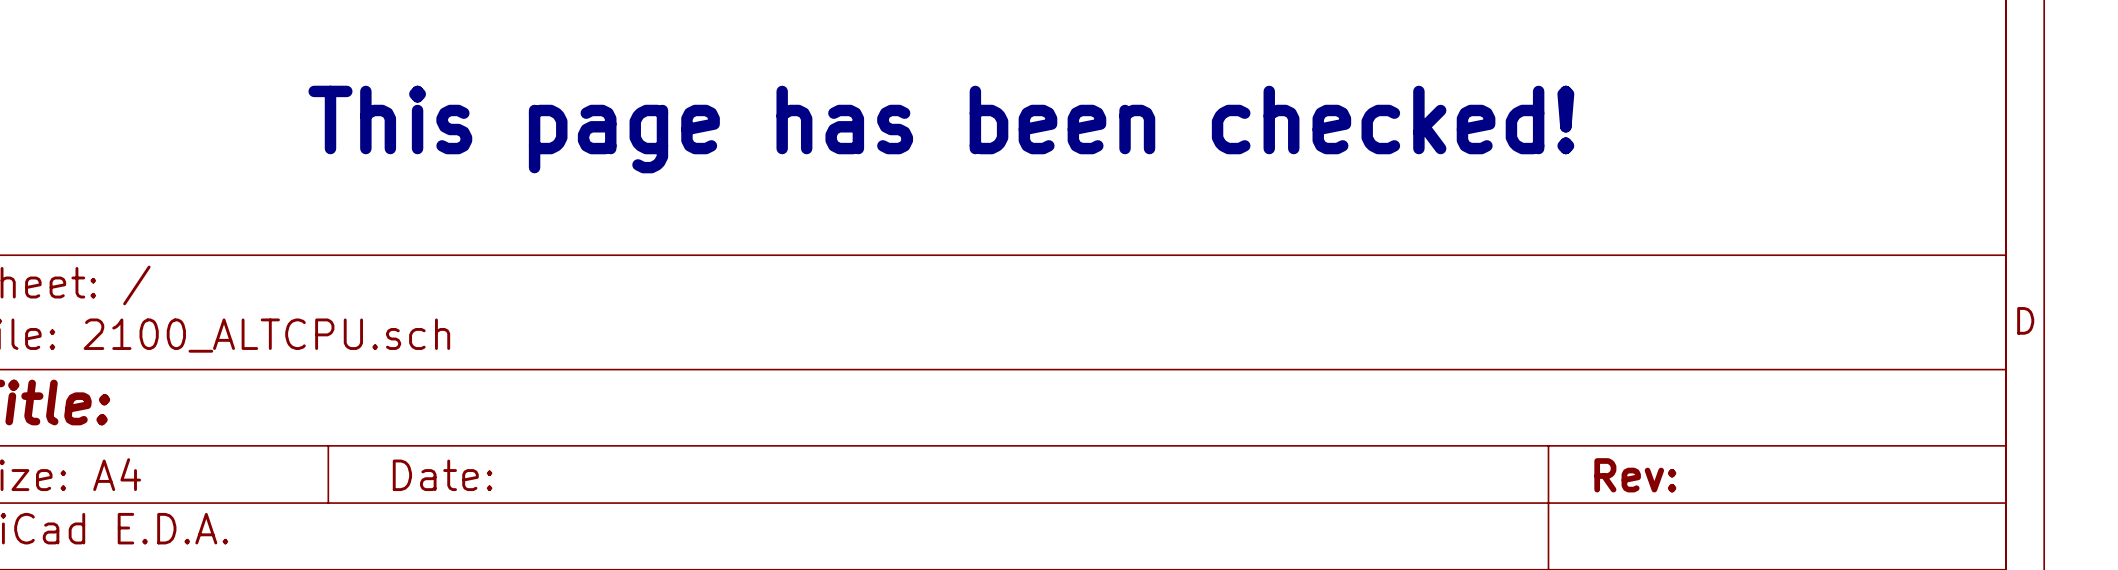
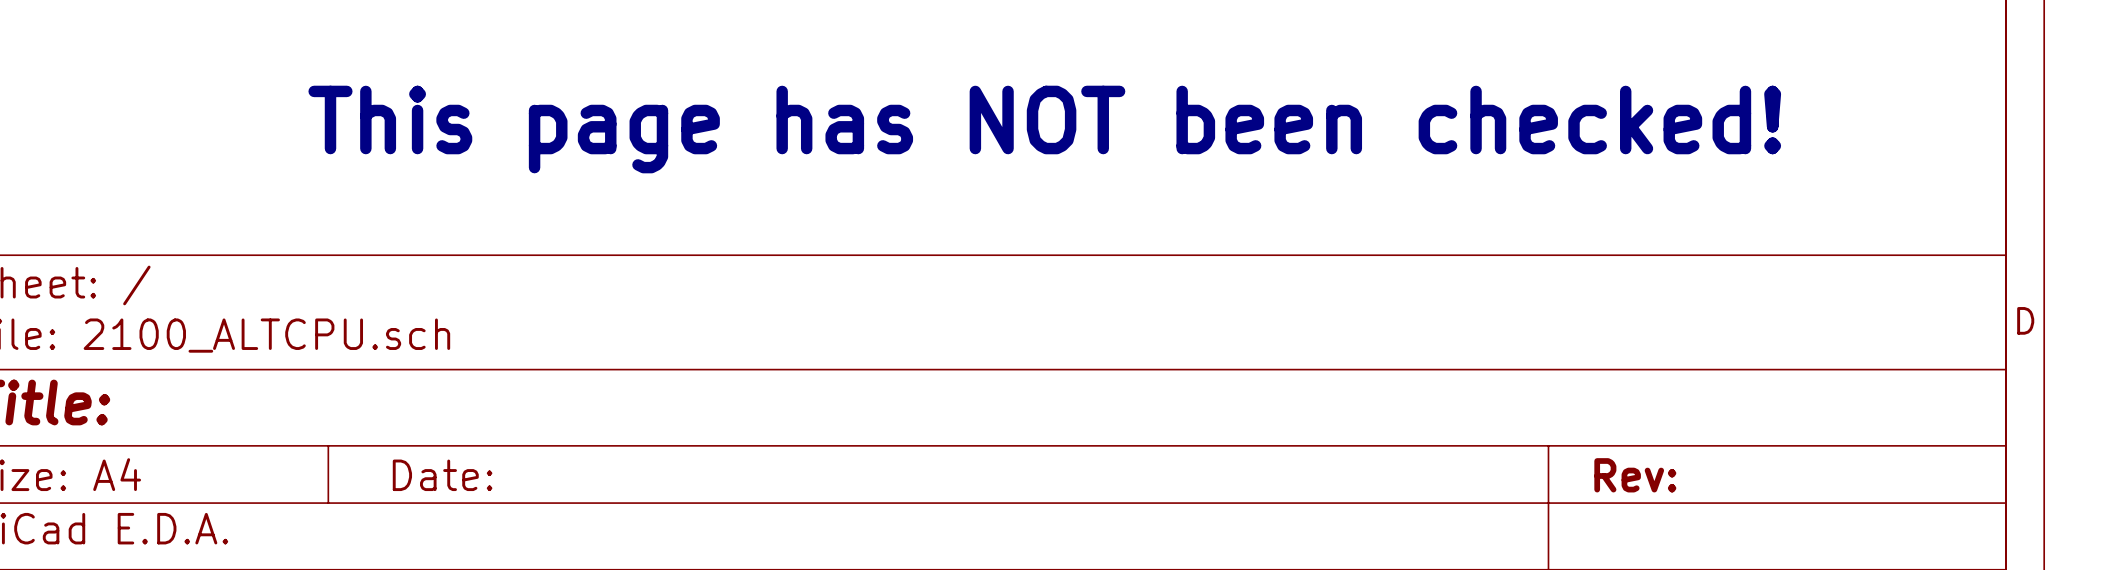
text: This page has been checked! (941, 129) -> This page has NOT been checked! (1044, 129)

